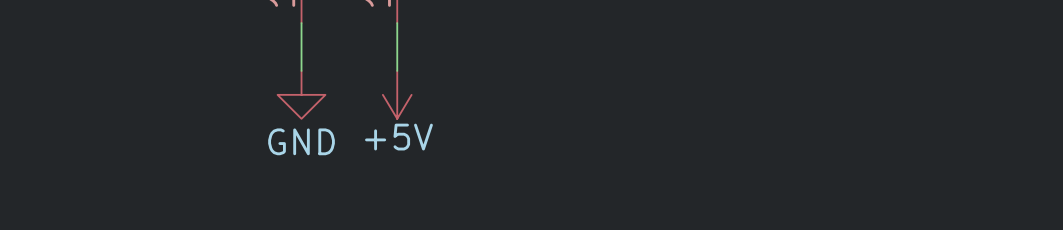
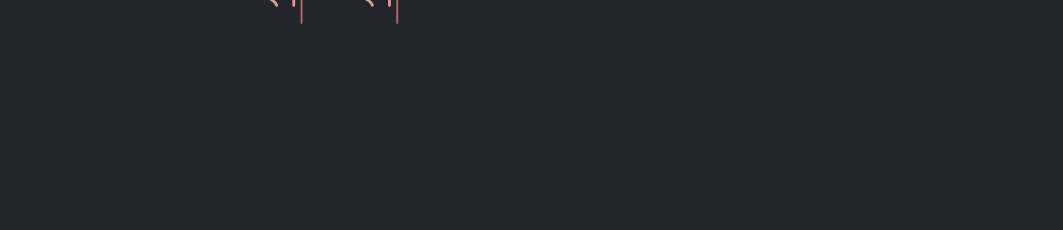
wire: (301, 23) (301, 70) -> none
wire: (397, 23) (397, 70) -> none
power symbol: GND (301, 94) -> none
power symbol: +5V (397, 94) -> none

